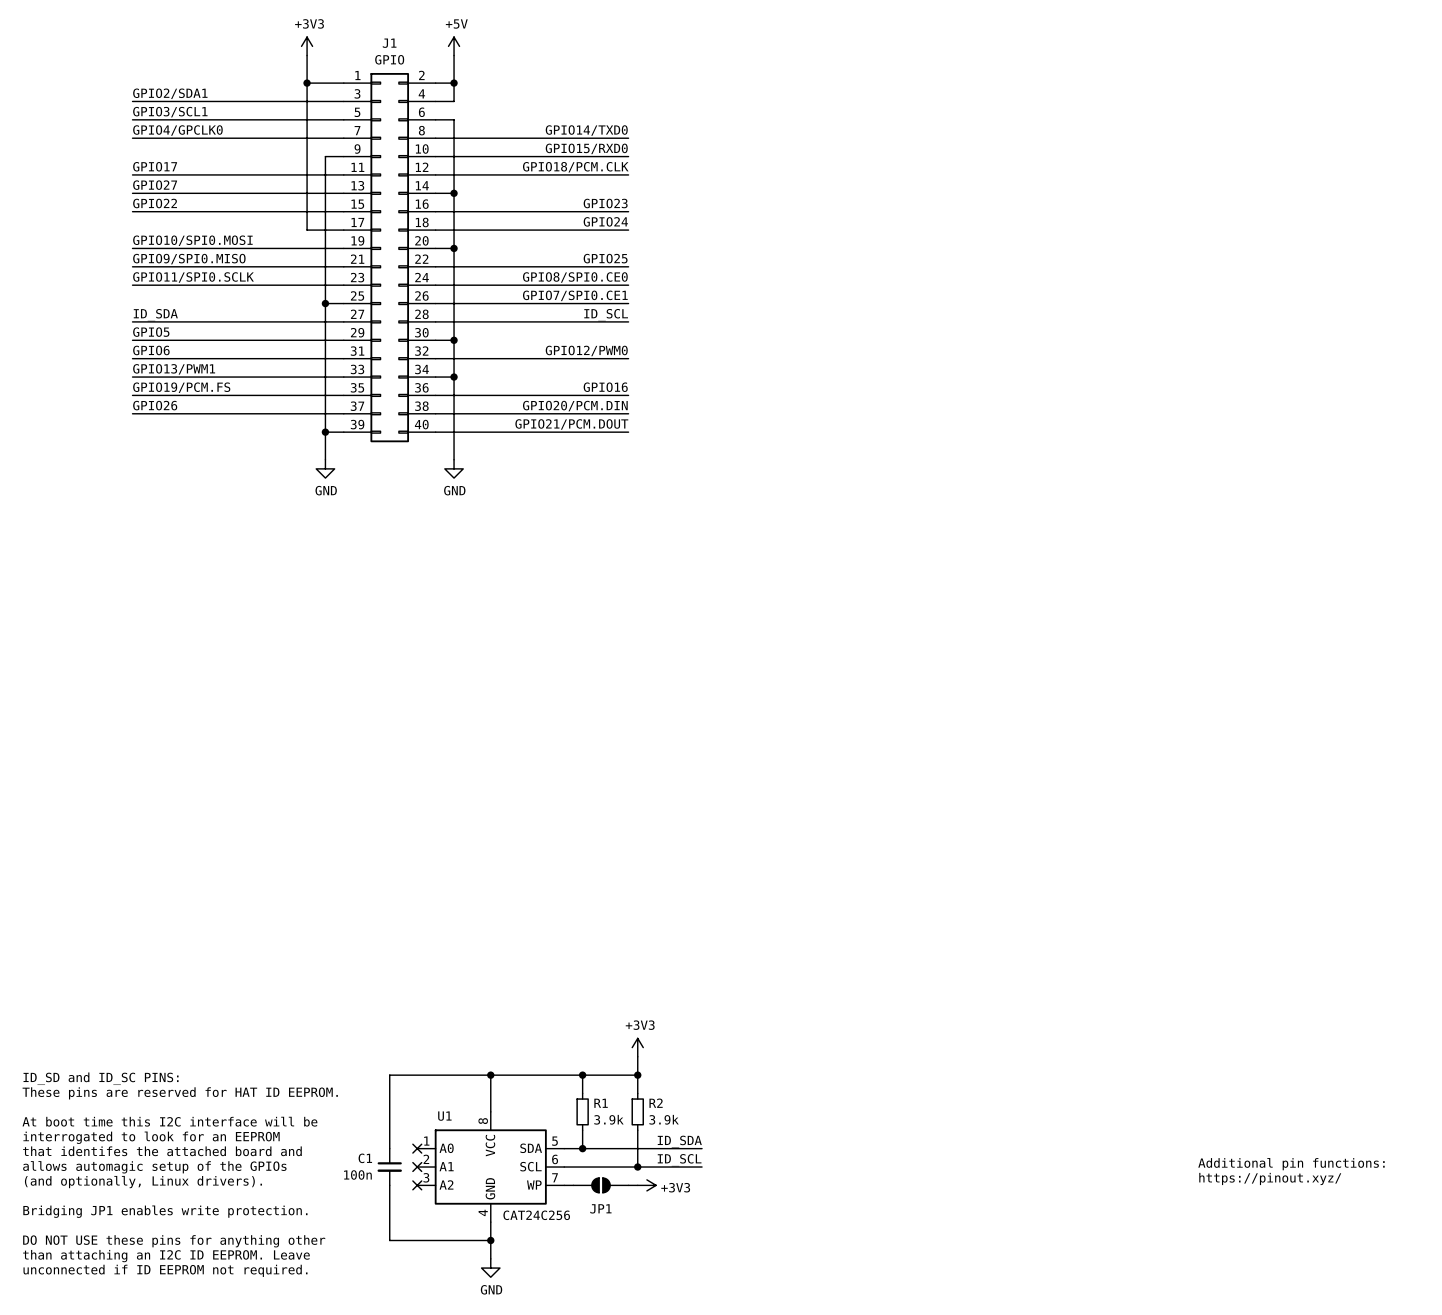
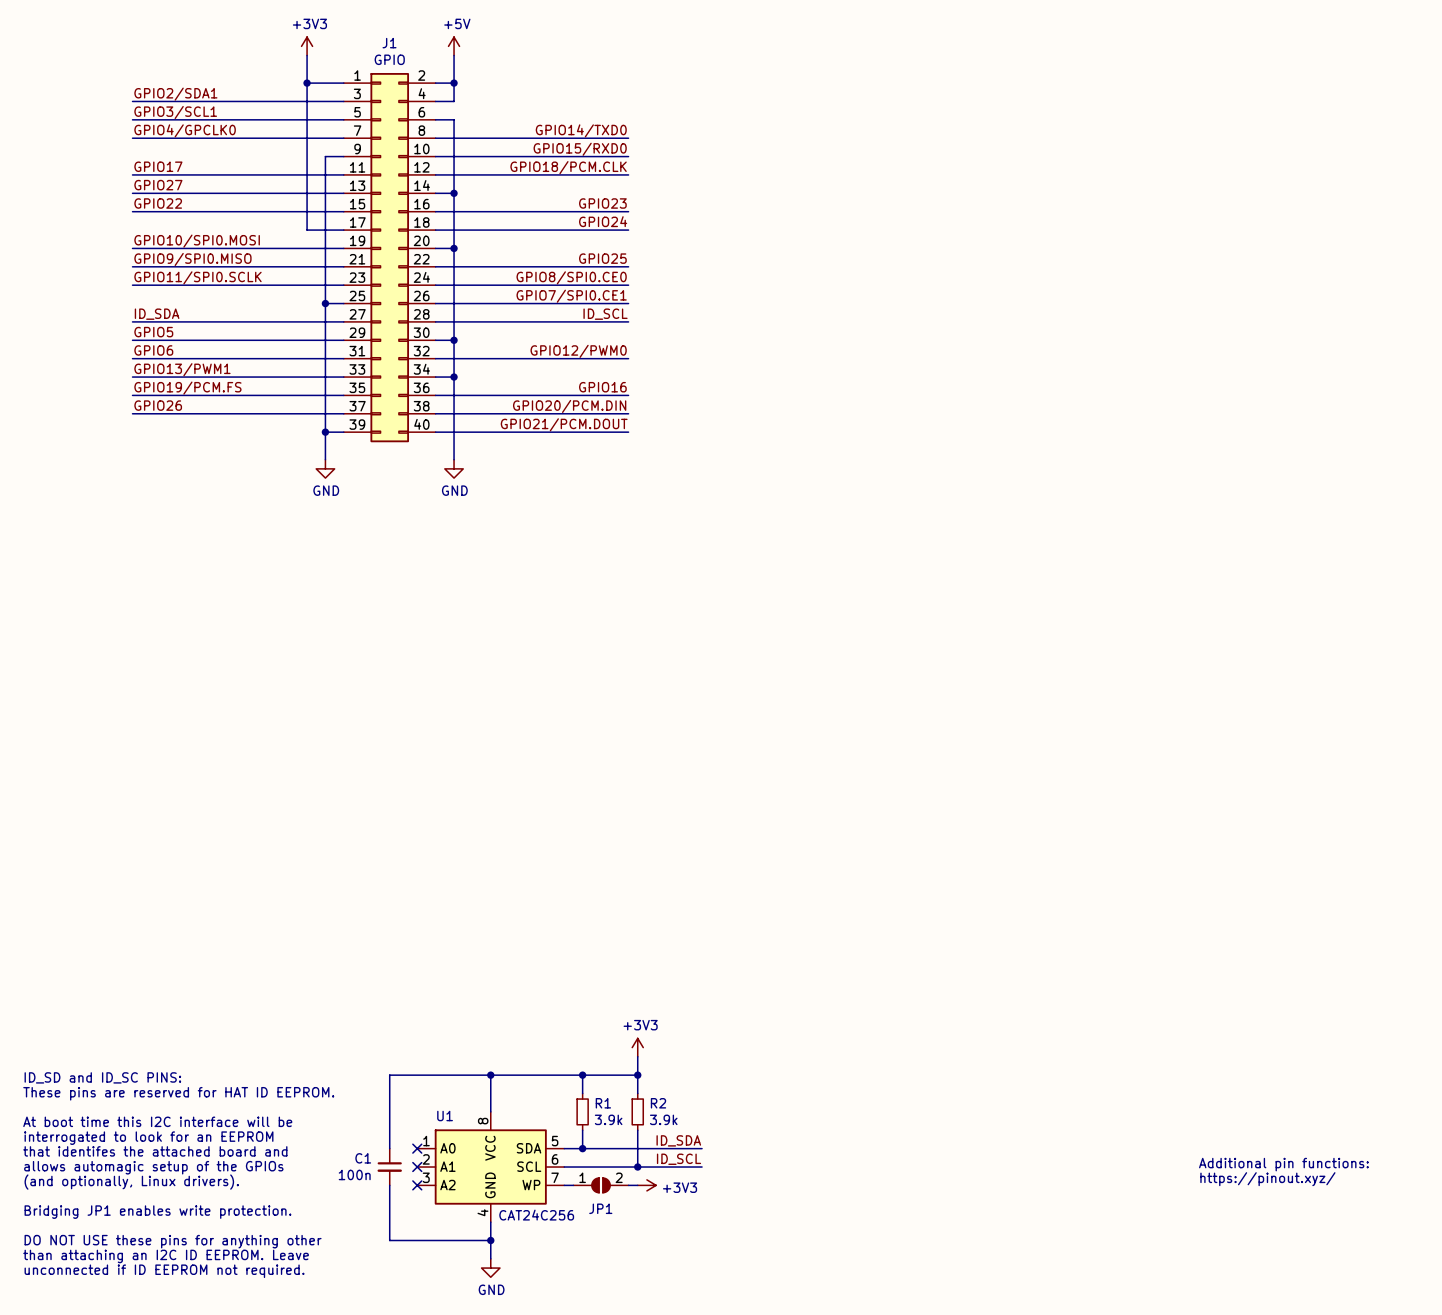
JP1 pin number: none -> 1 (582, 1177)
JP1 pin number: none -> 2 (619, 1177)

